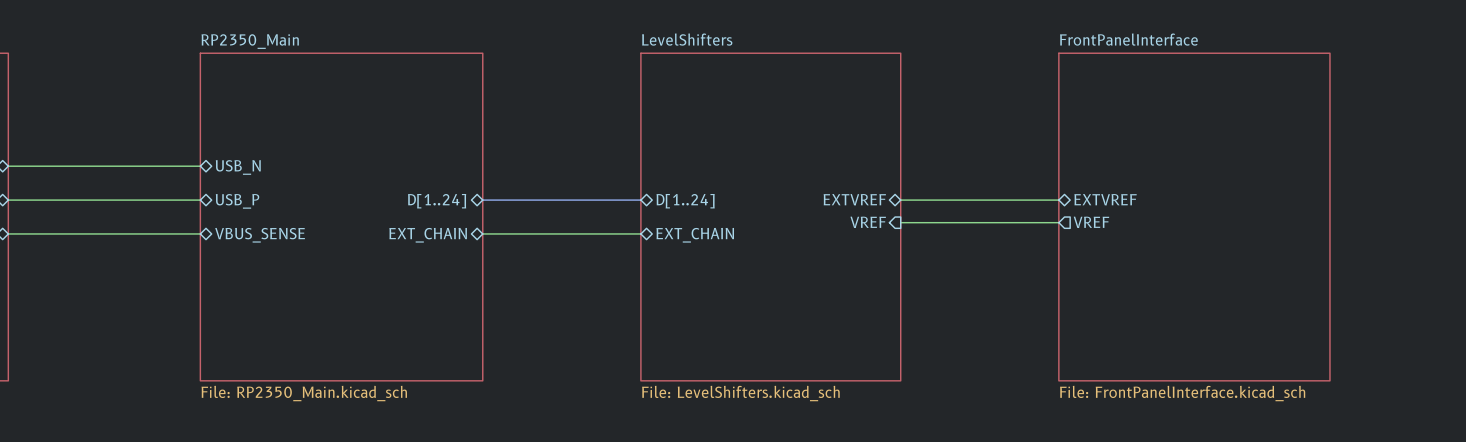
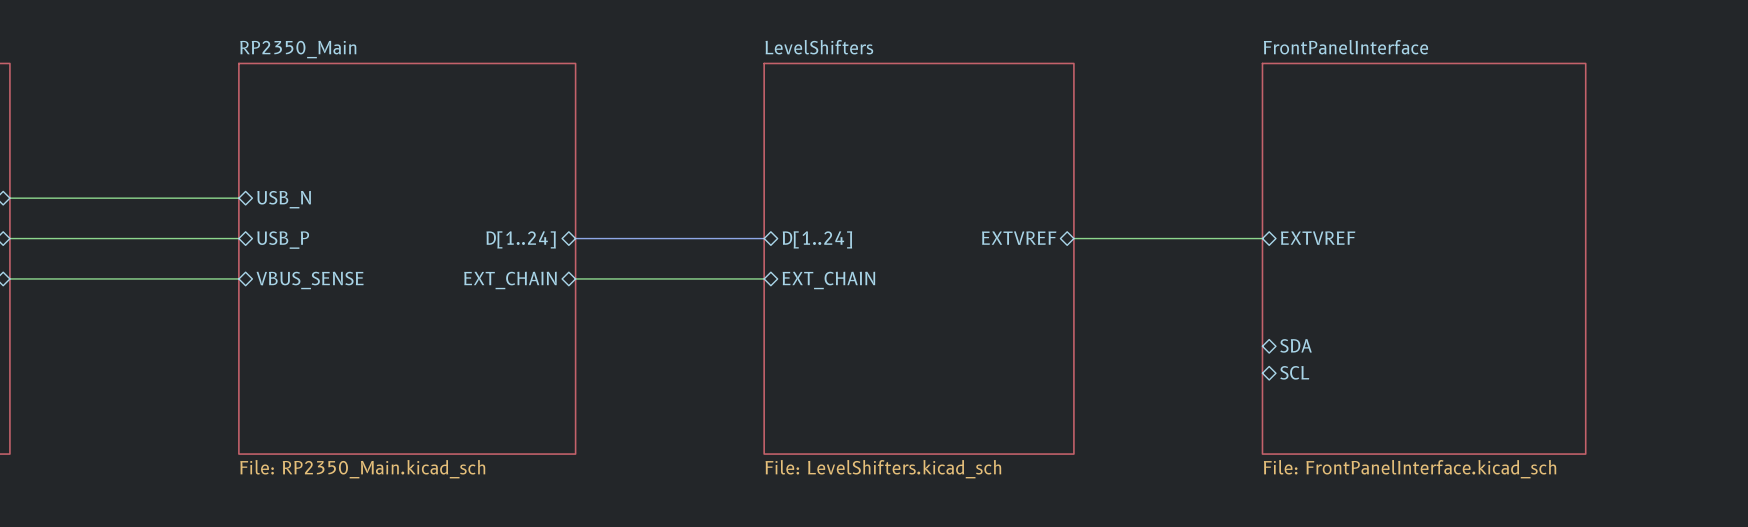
sheet pin: VREF (868, 222) -> none
wire: (900, 222) (1058, 222) -> none
sheet pin: VREF (1091, 222) -> none
sheet pin: none -> SDA (1296, 345)
sheet pin: none -> SCL (1294, 372)

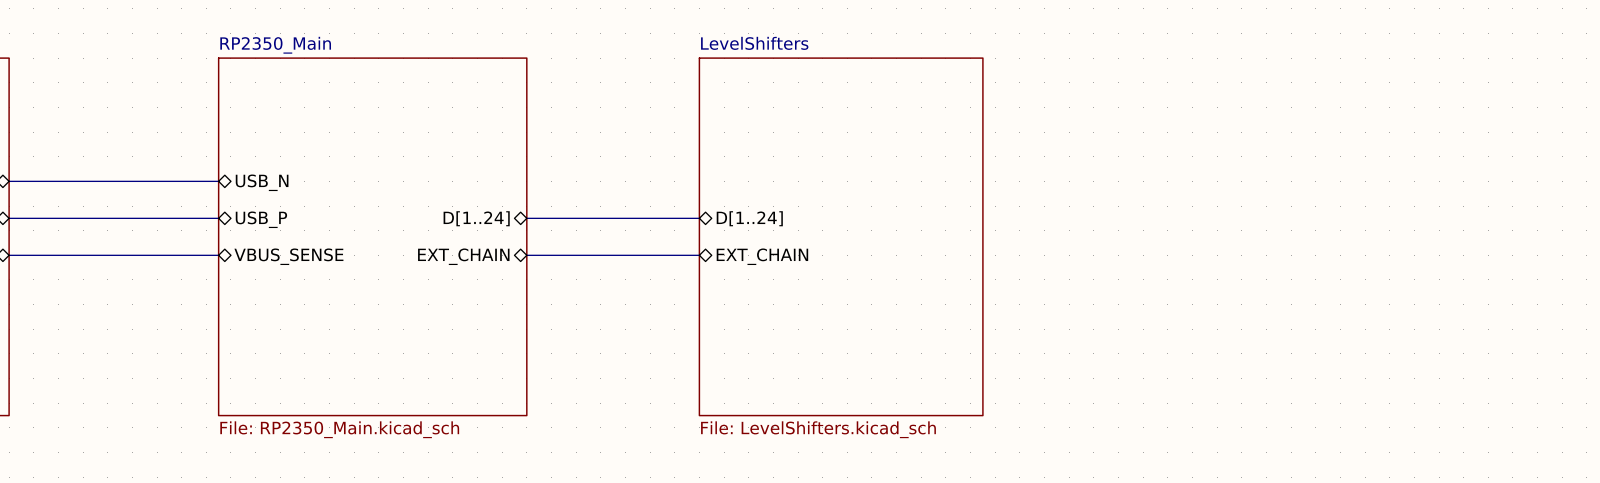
sheet pin: EXTVREF (1019, 238) -> none
wire: (1073, 238) (1262, 238) -> none
sheet pin: EXTVREF (1318, 238) -> none
sheet FrontPanelInterface: File: FrontPanelInterface.kicad_sch (1424, 258) -> none
sheet pin: SDA (1296, 345) -> none
sheet pin: SCL (1294, 372) -> none

